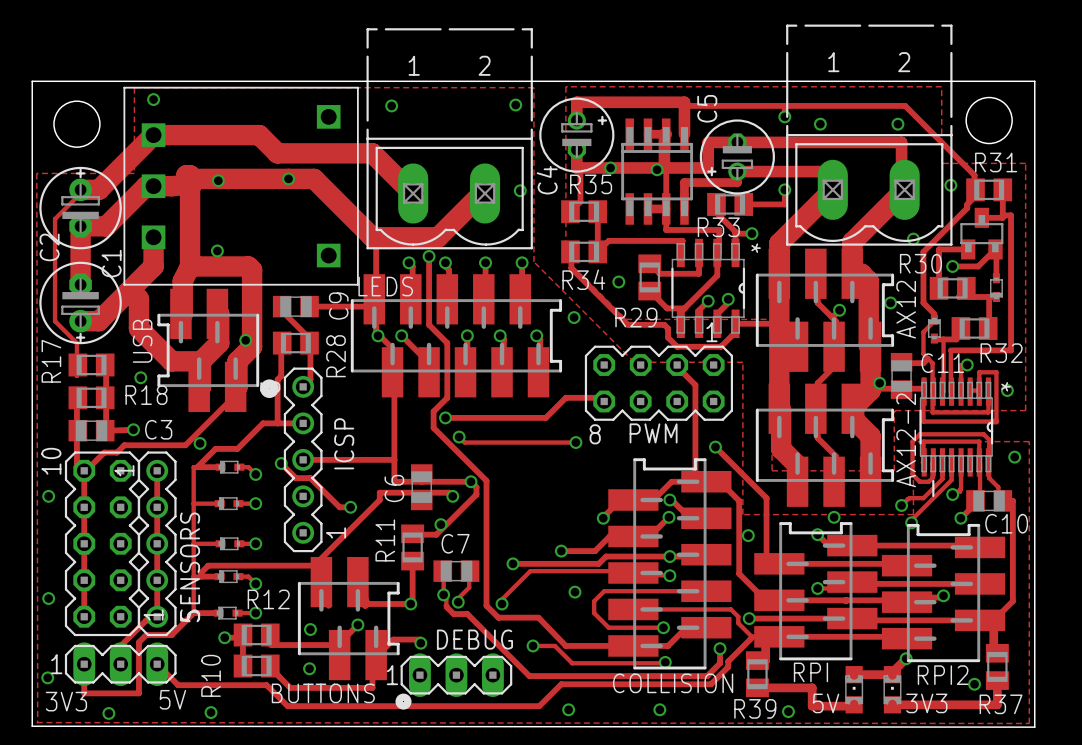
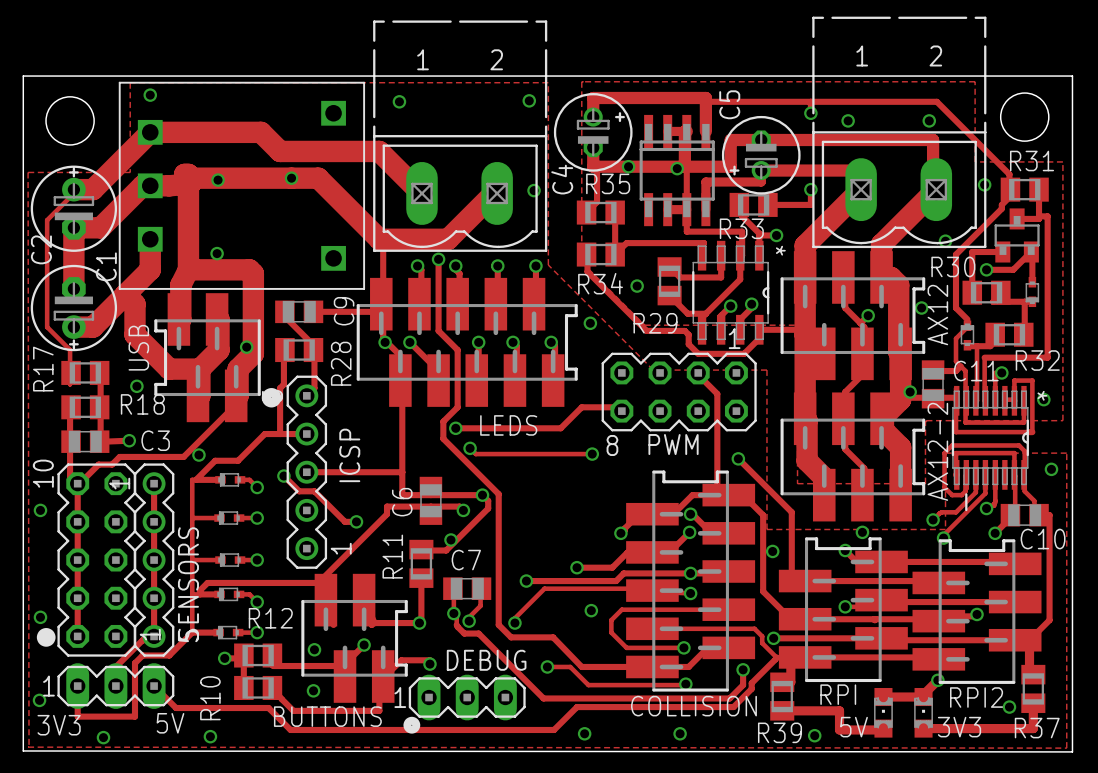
LEDS name position: LEDS (385, 286) -> LEDS (508, 425)
drawing: none -> [36, 628, 56, 647]

